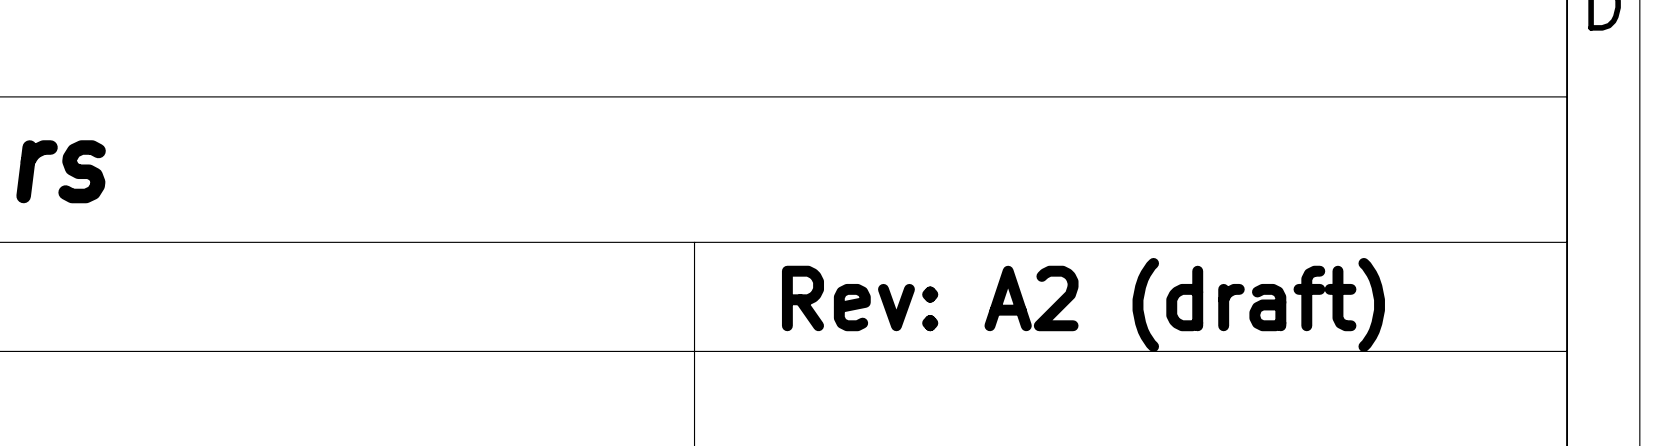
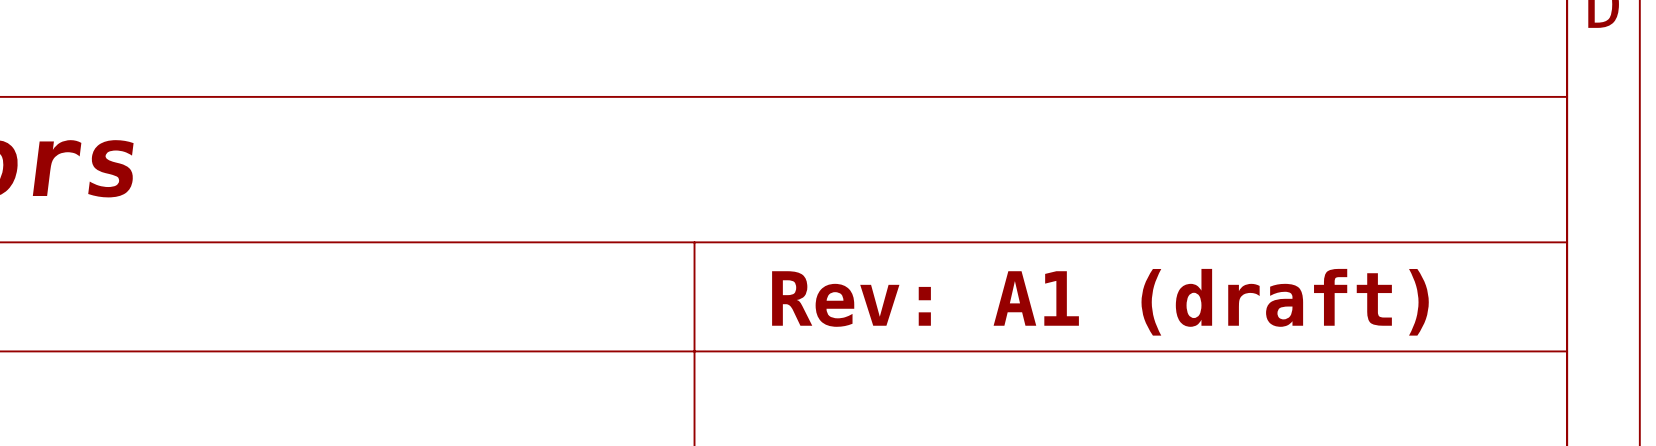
title block: Rev: A2 (draft) (1083, 304) -> Rev: A1 (draft) (1100, 302)

